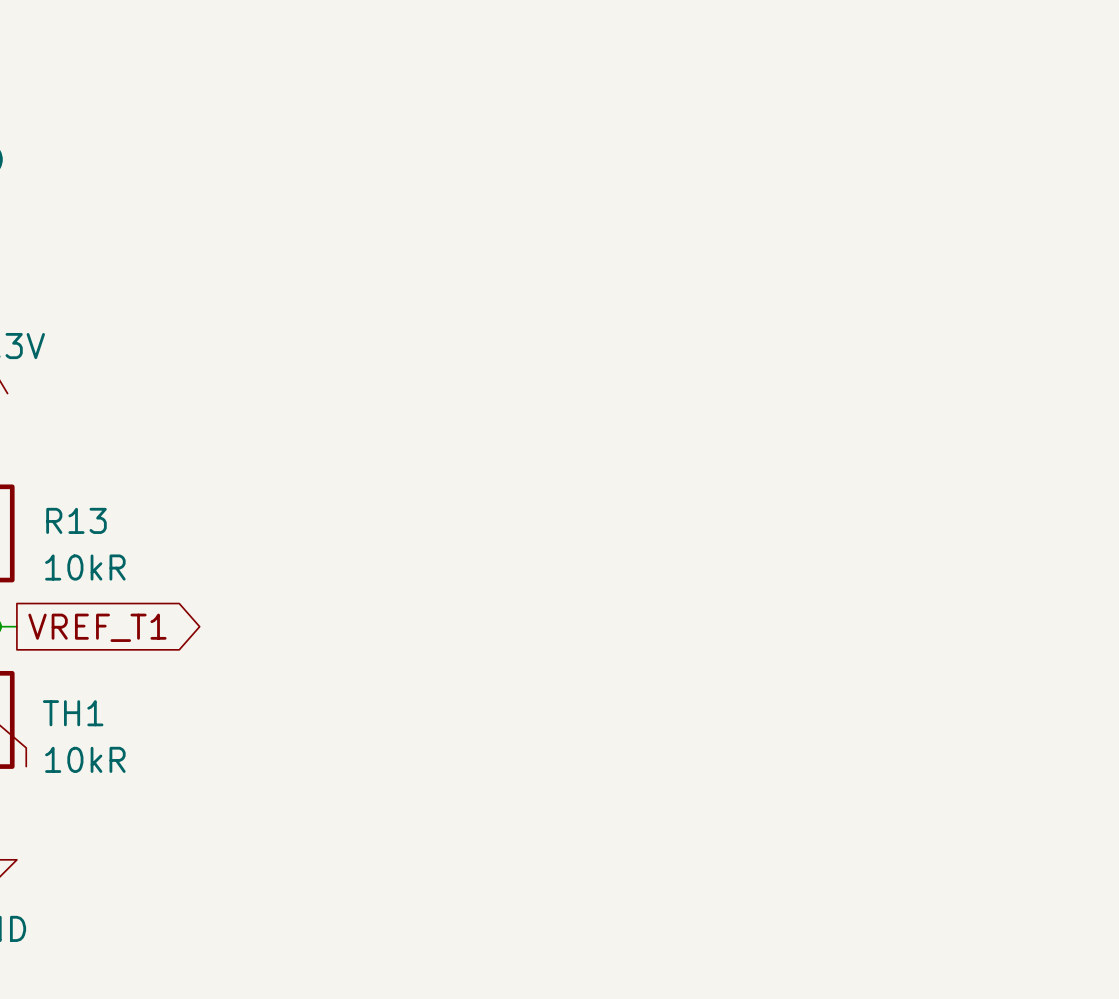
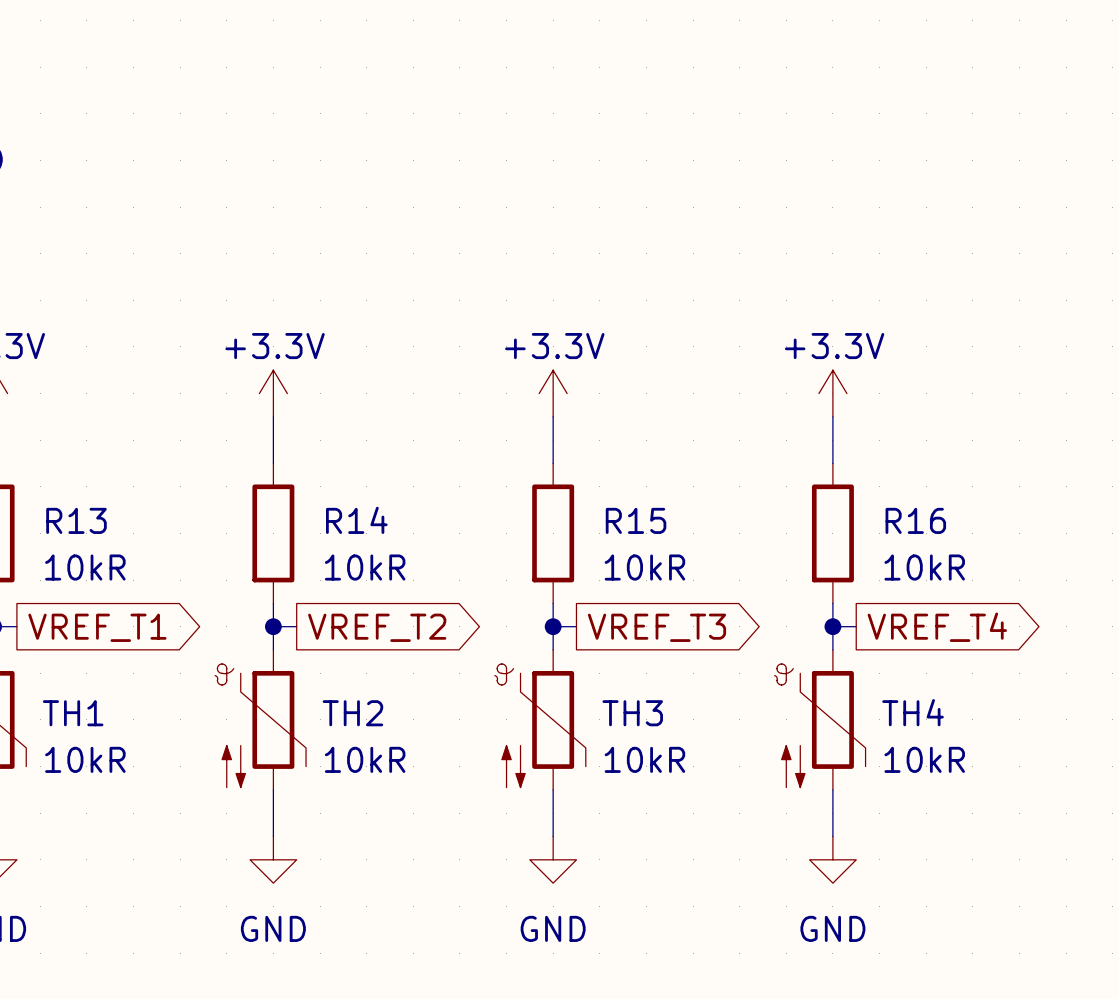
power symbol: none -> +3.3V (273, 393)
power symbol: none -> +3.3V (553, 393)
power symbol: none -> +3.3V (832, 393)
wire: none -> (273, 416) (273, 463)
wire: none -> (553, 416) (553, 463)
wire: none -> (832, 416) (832, 463)
R14: none -> 10kR (273, 533)
R15: none -> 10kR (553, 533)
R16: none -> 10kR (832, 533)
wire: none -> (273, 603) (273, 650)
wire: none -> (553, 603) (553, 650)
wire: none -> (832, 603) (832, 650)
wire: none -> (273, 626) (296, 626)
junction: none -> (273, 626)
wire: none -> (553, 626) (576, 626)
junction: none -> (553, 626)
wire: none -> (832, 626) (856, 626)
junction: none -> (832, 626)
global label: none -> VREF_T2 (377, 627)
global label: none -> VREF_T3 (656, 627)
global label: none -> VREF_T4 (937, 627)
TH2: none -> 10kR (260, 719)
TH3: none -> 10kR (540, 719)
TH4: none -> 10kR (820, 719)
wire: none -> (273, 789) (273, 836)
wire: none -> (553, 789) (553, 836)
wire: none -> (832, 789) (832, 836)
power symbol: none -> GND (273, 859)
power symbol: none -> GND (553, 859)
power symbol: none -> GND (832, 859)

